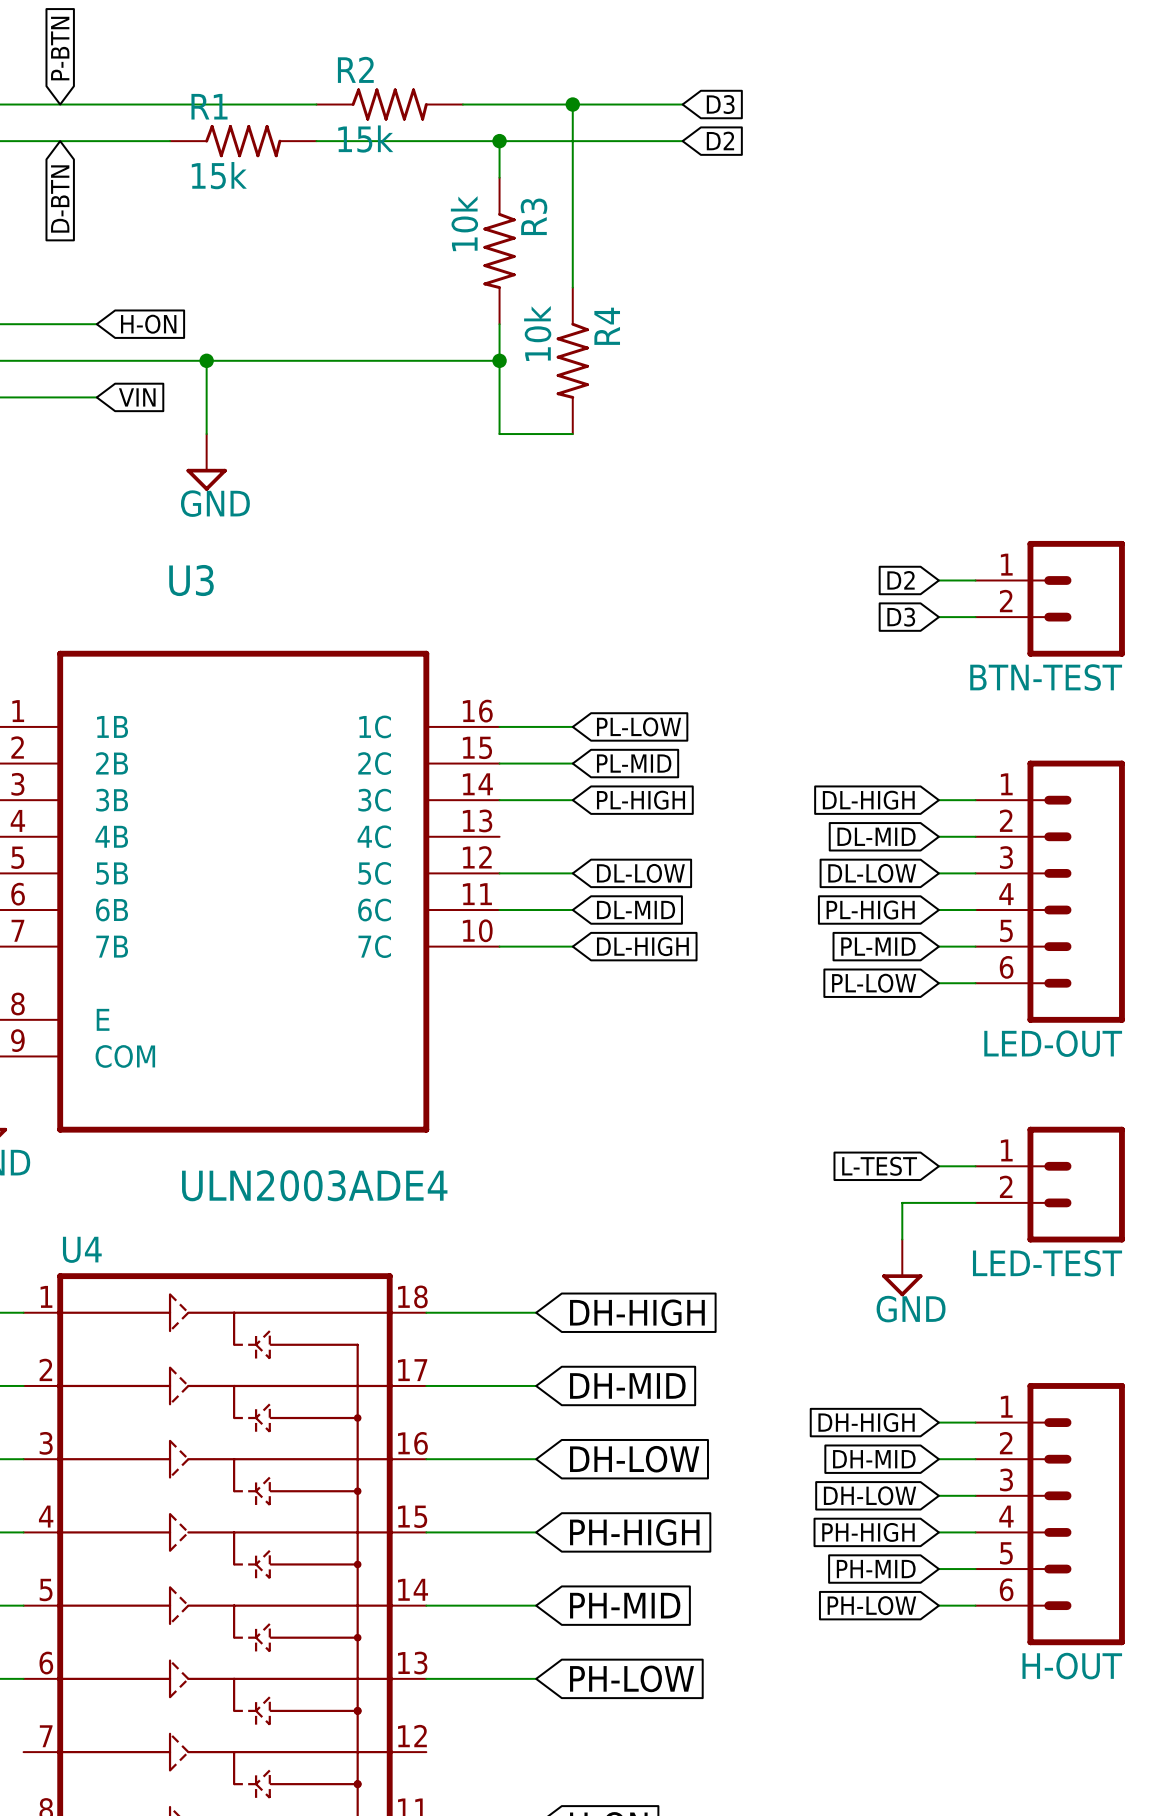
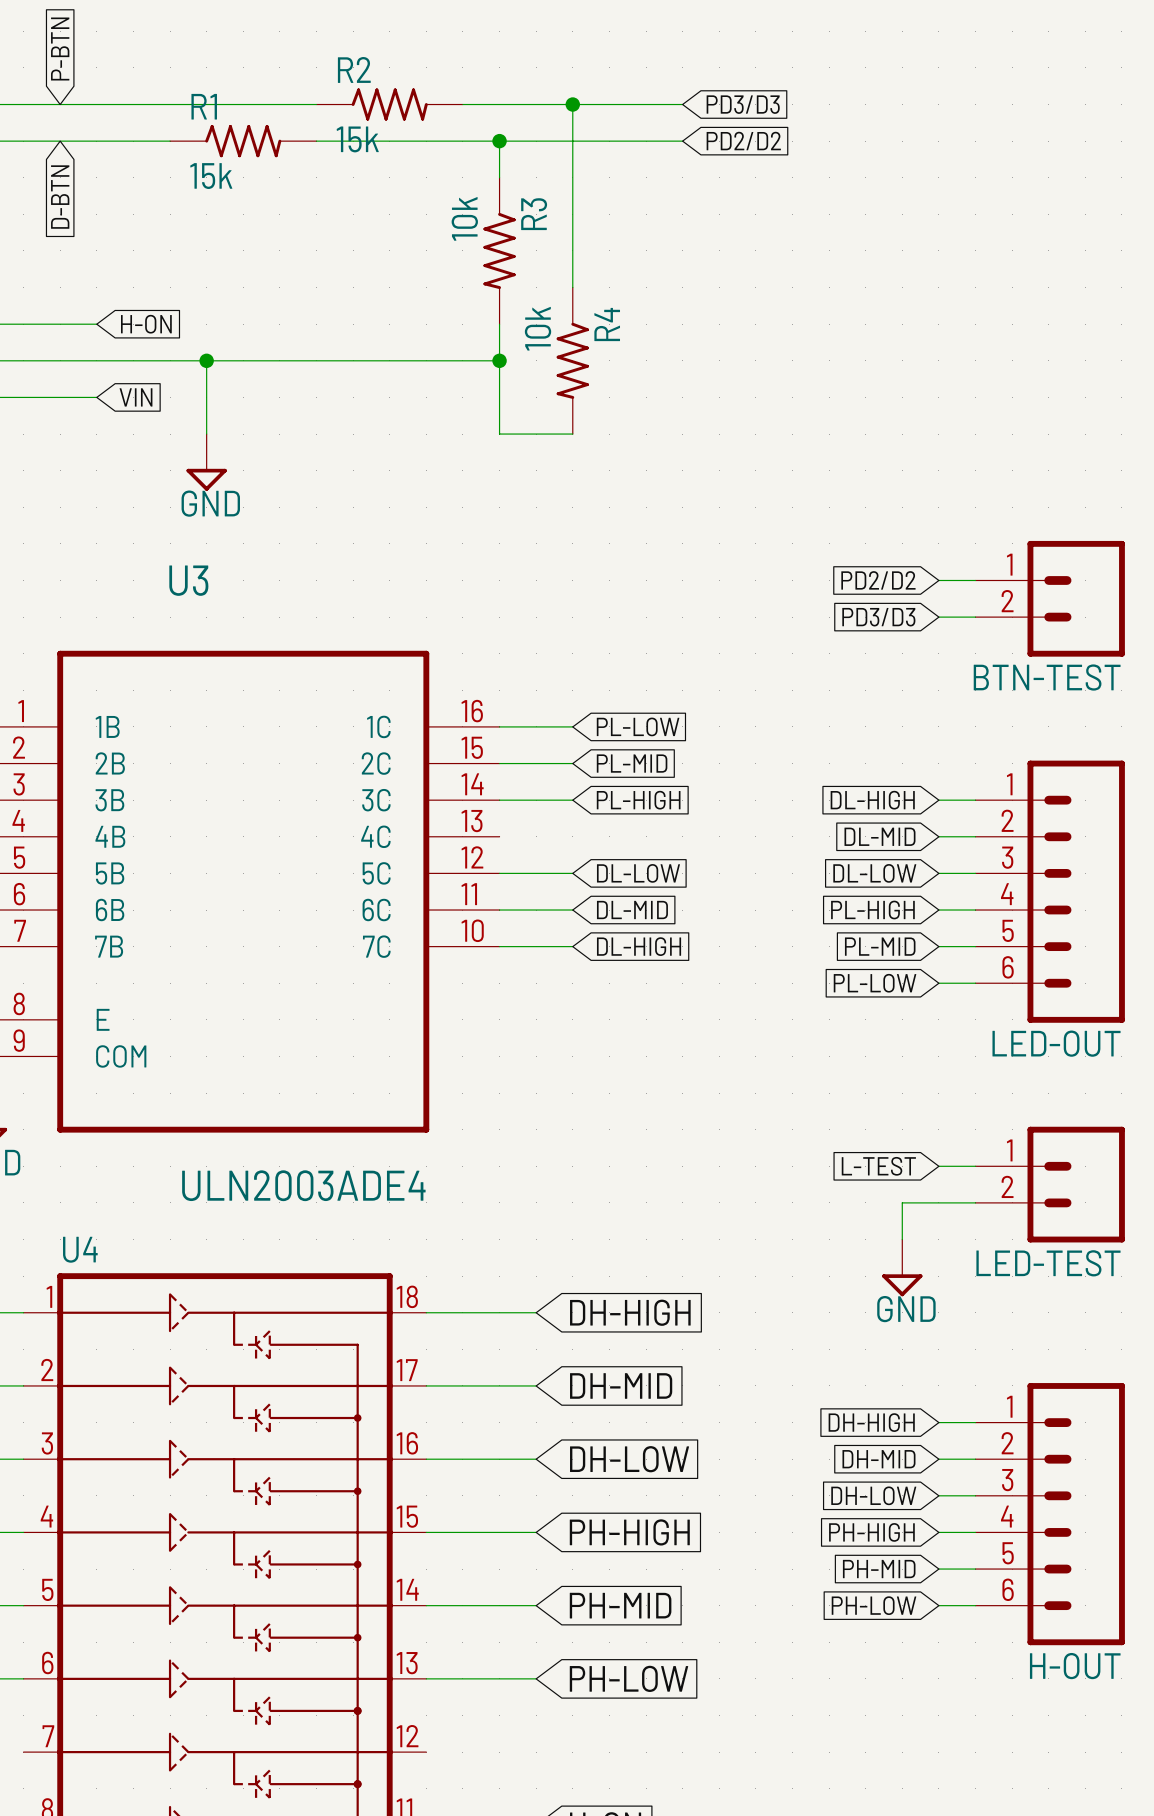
global label: D3 (720, 104) -> PD3/D3 (743, 104)
global label: D2 (720, 140) -> PD2/D2 (743, 141)
global label: D2 (901, 580) -> PD2/D2 (878, 580)
global label: D3 (901, 617) -> PD3/D3 (878, 617)

